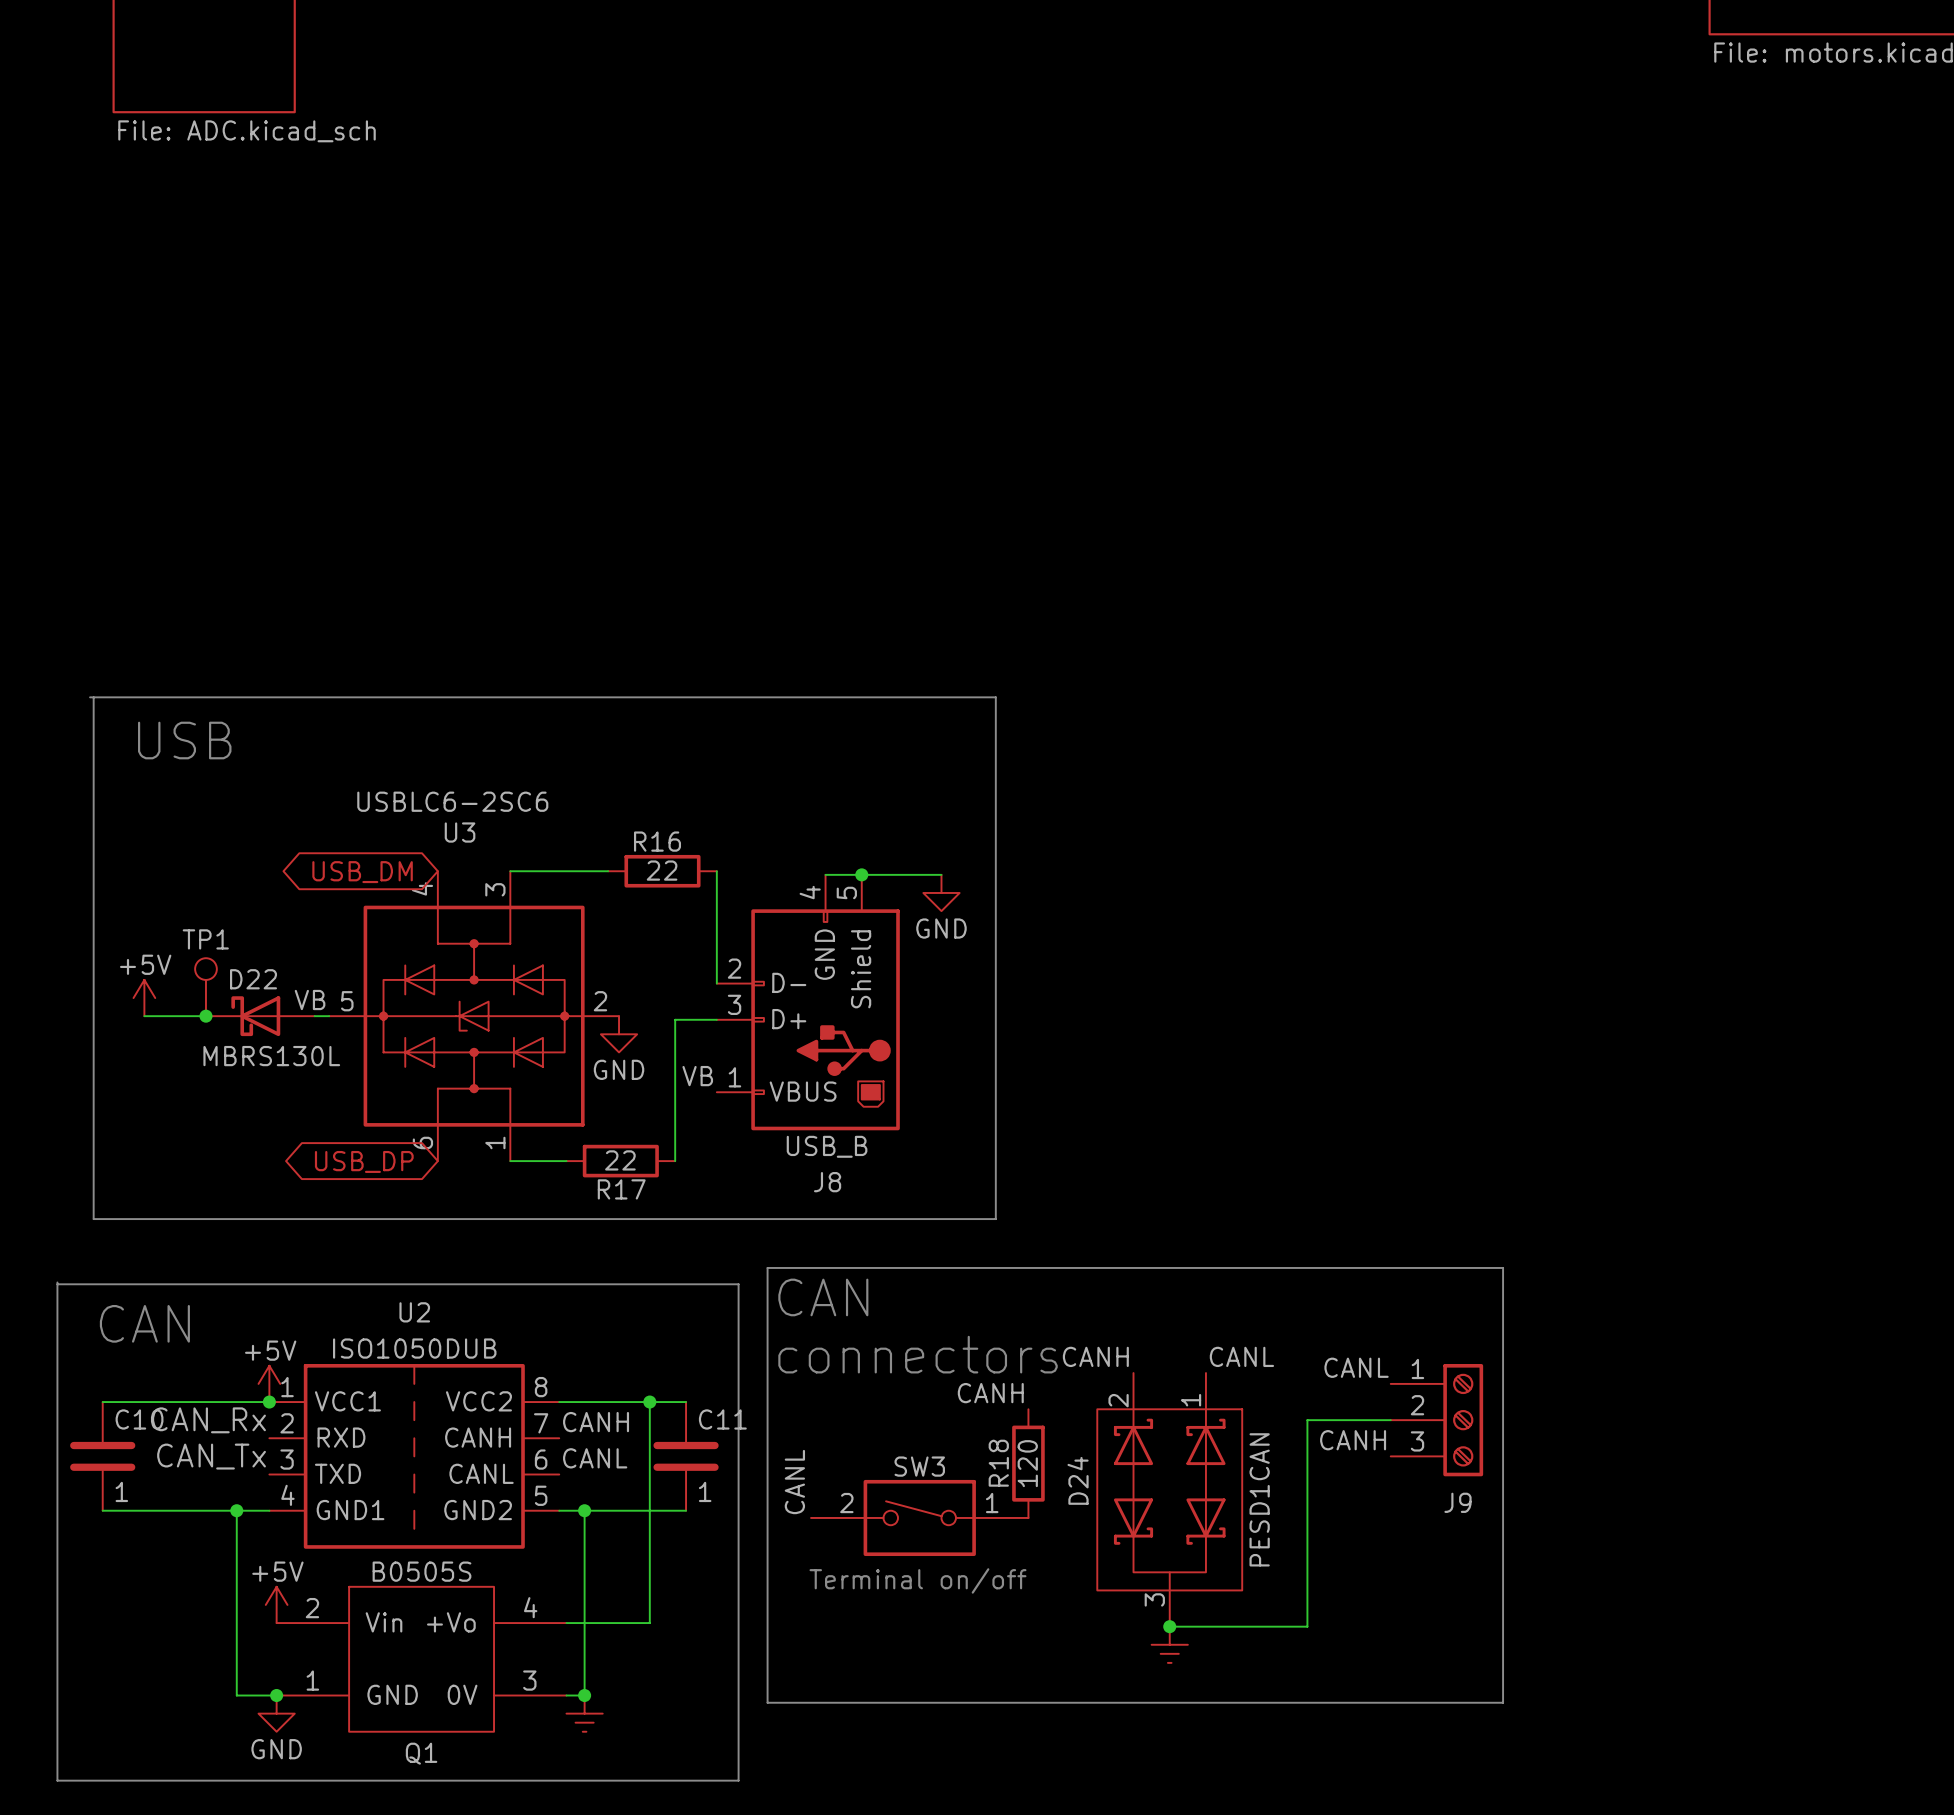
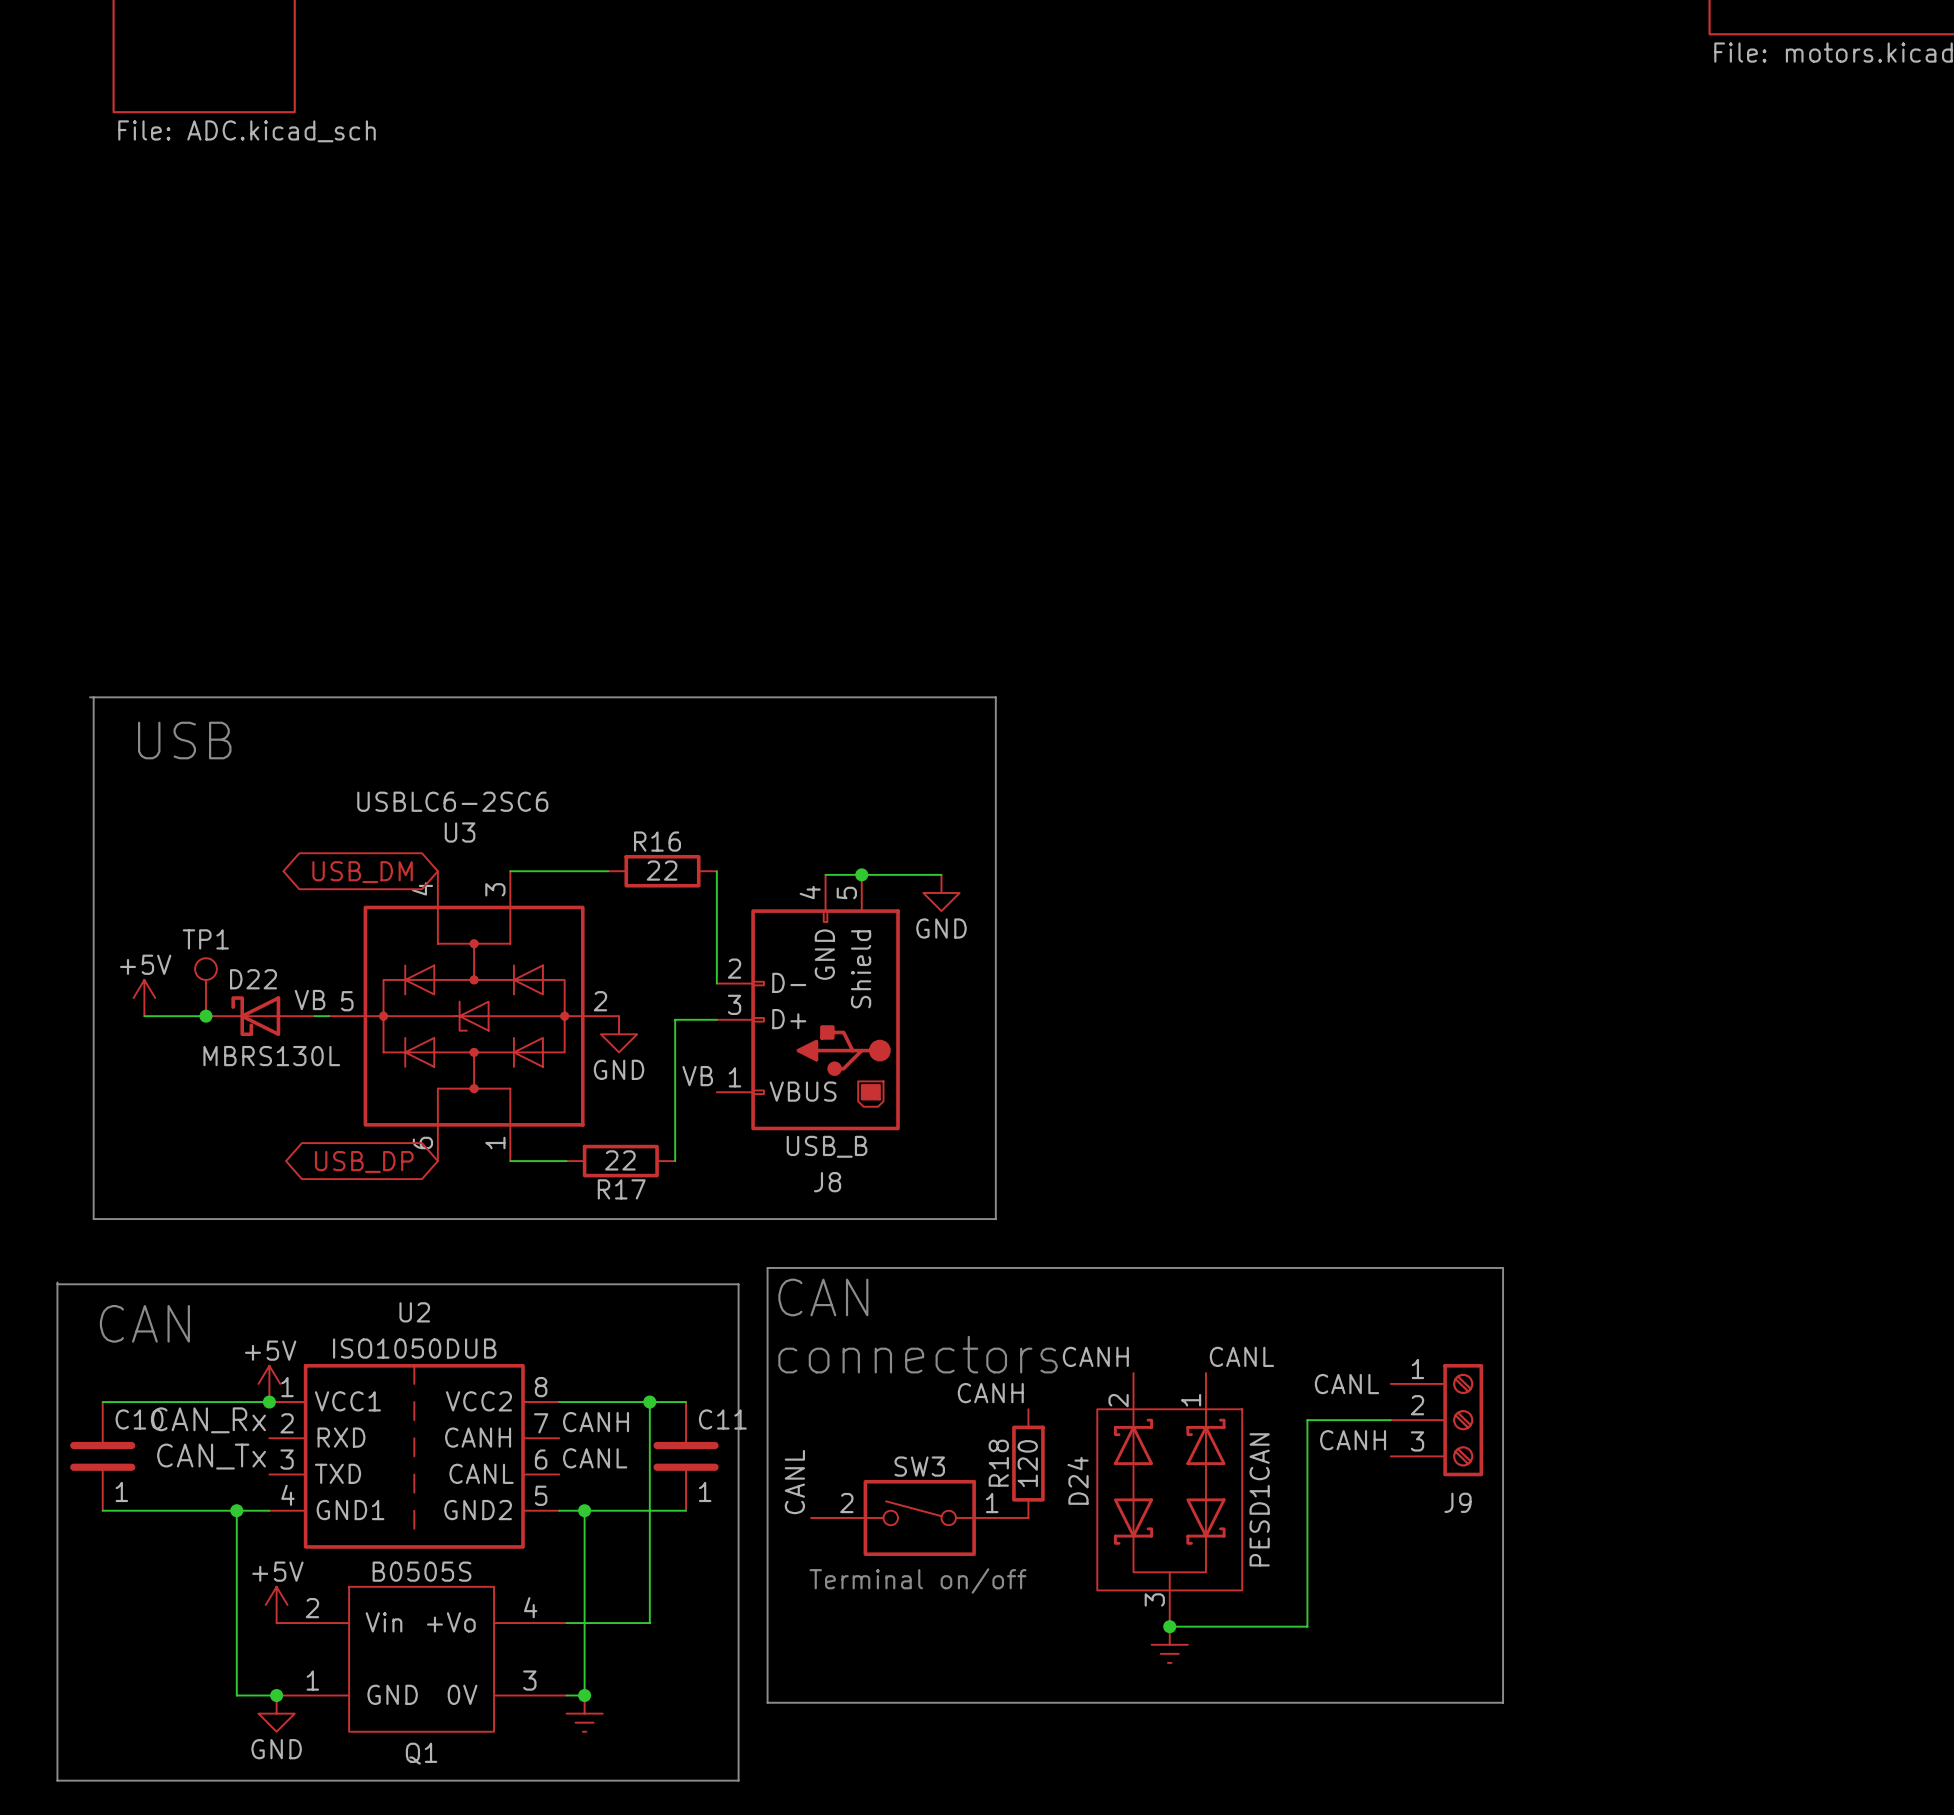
label position: CANL (1356, 1367) -> CANL (1346, 1384)

